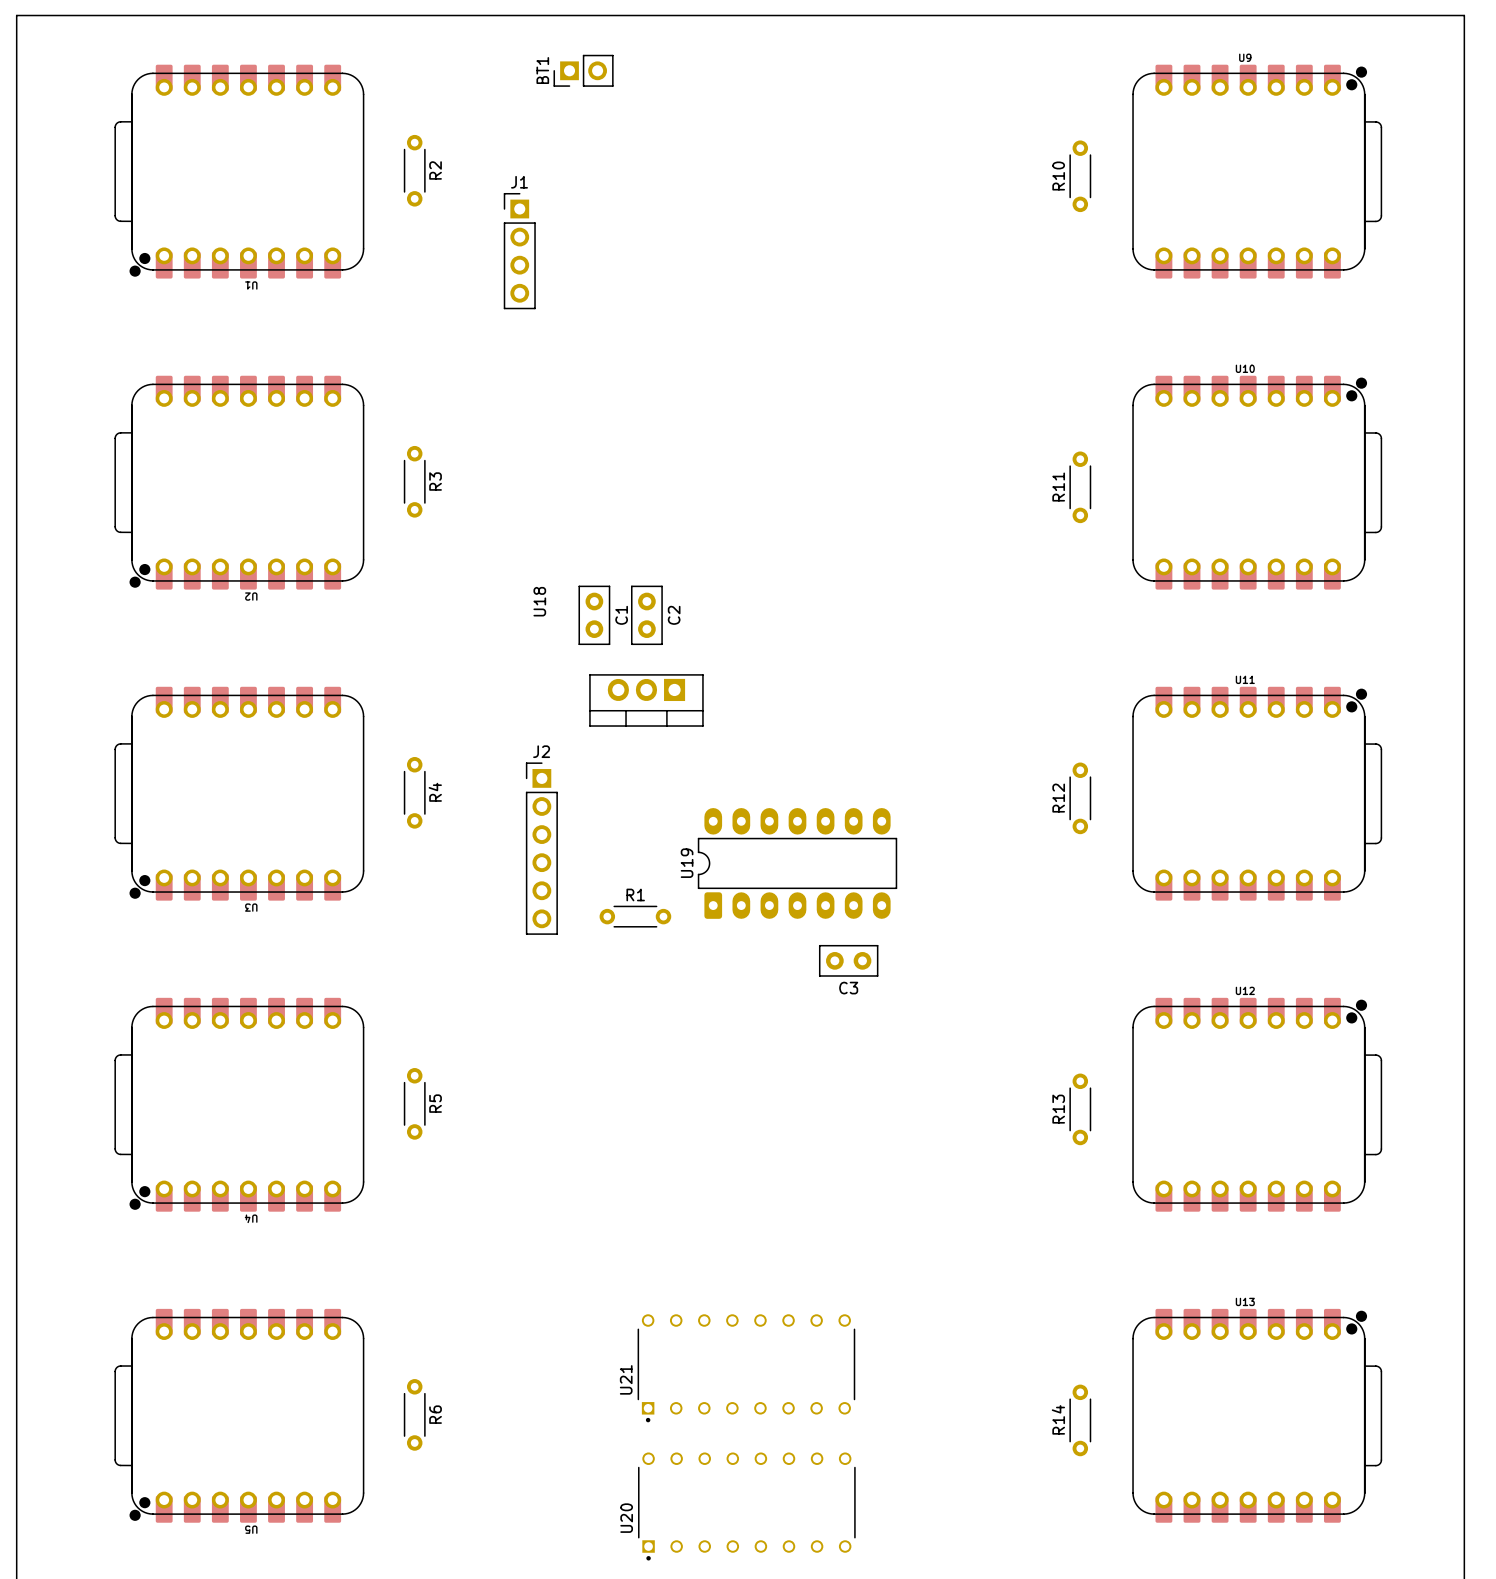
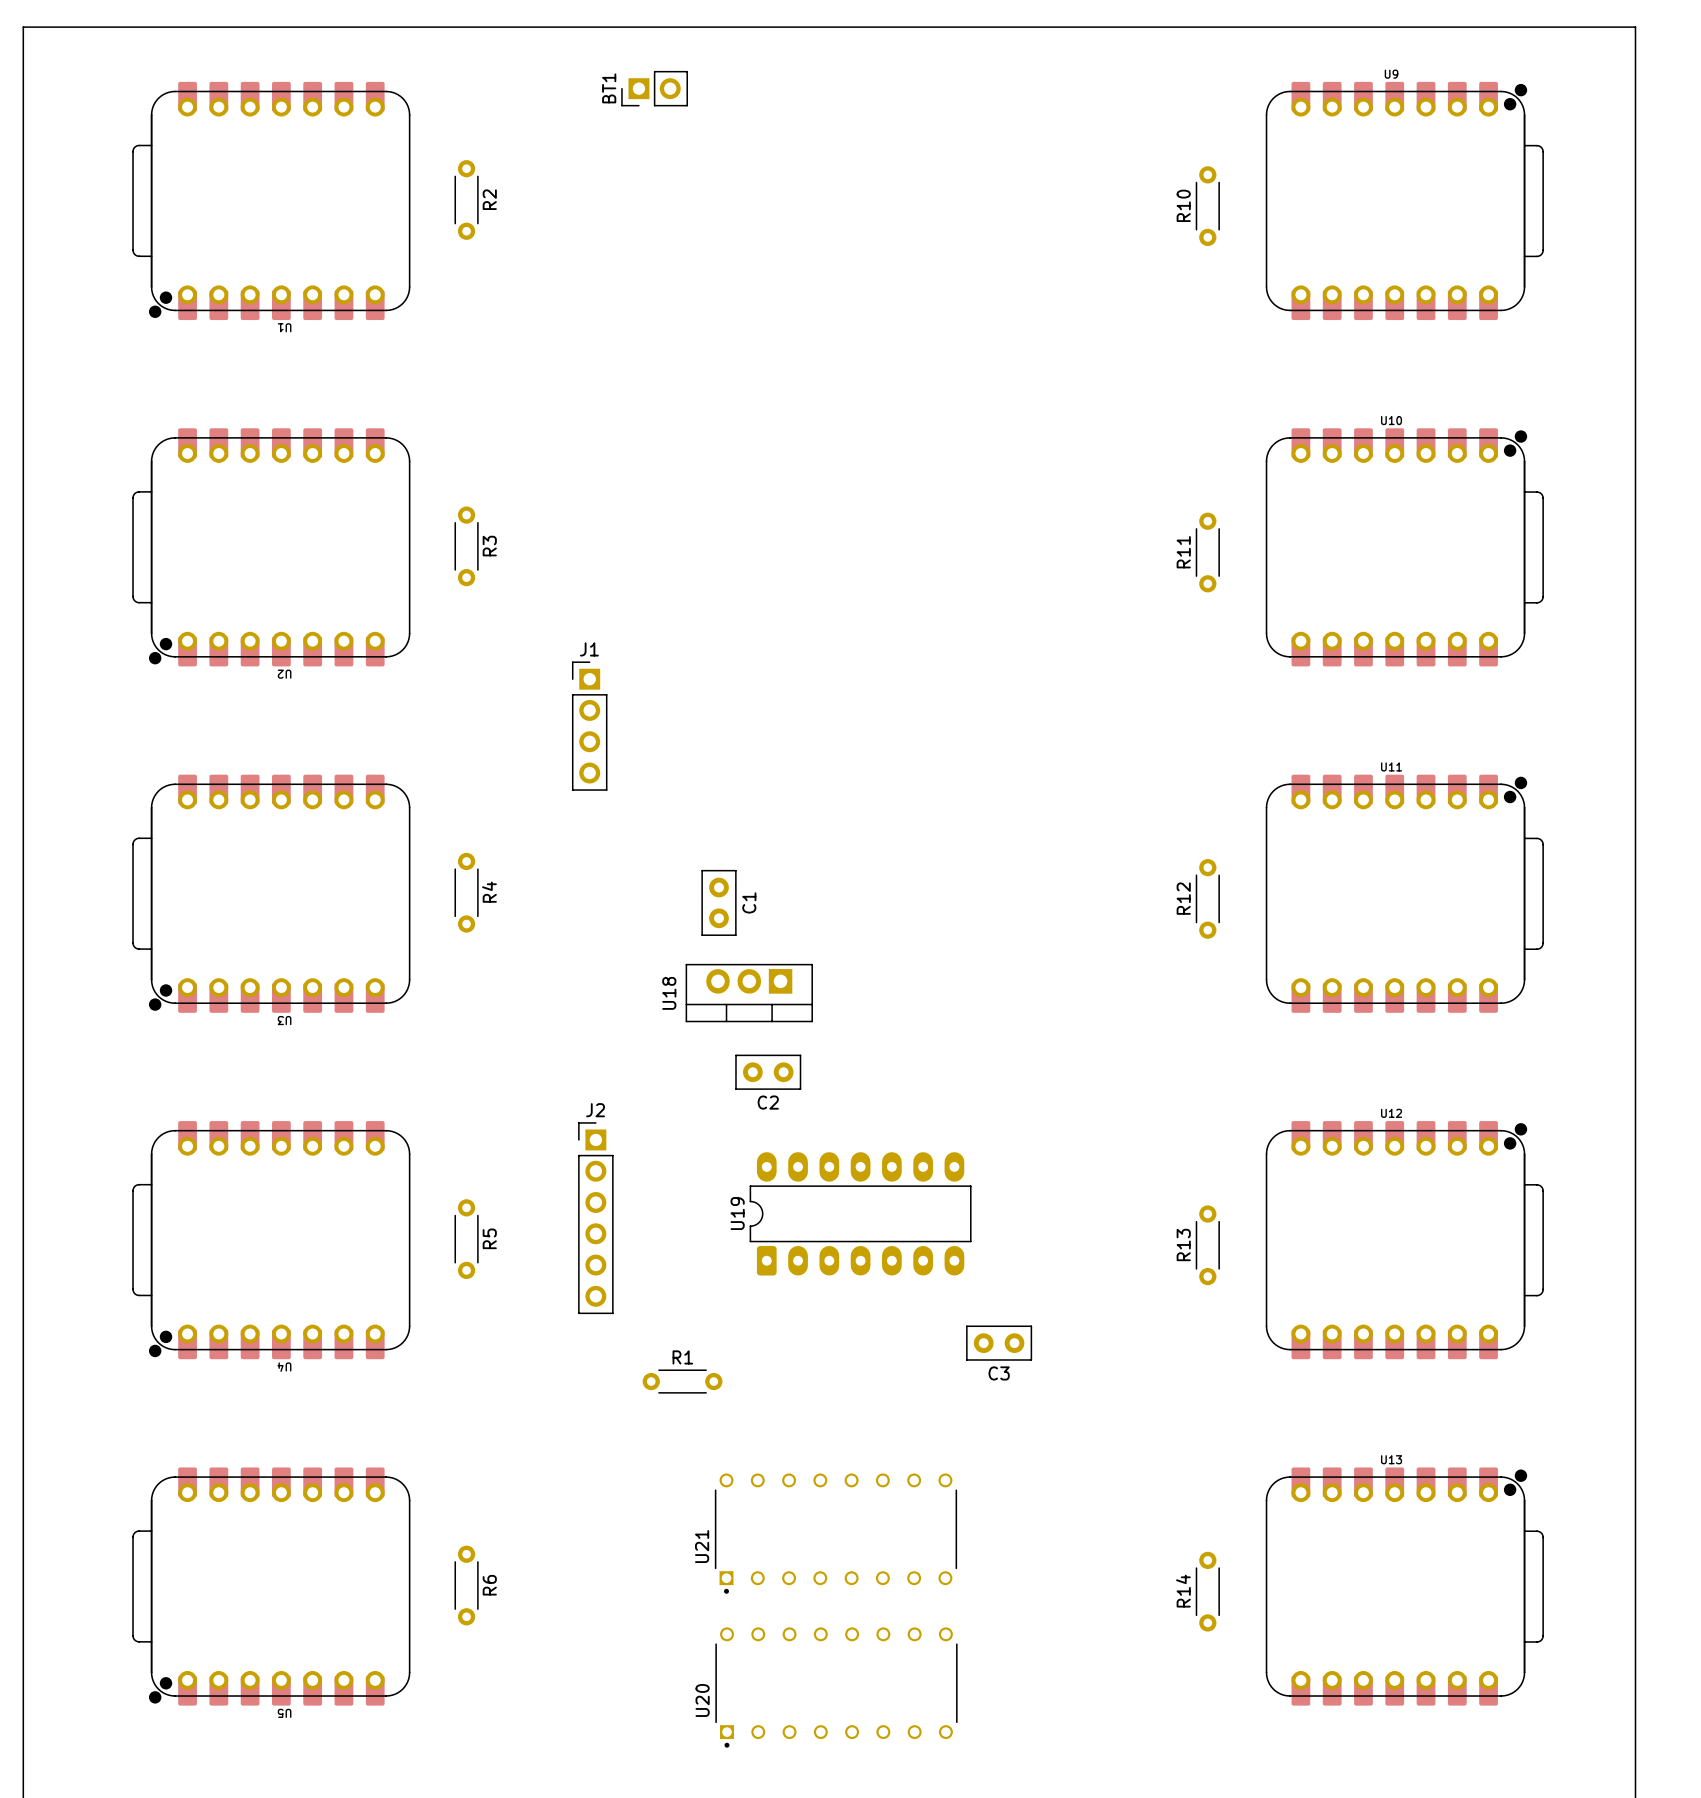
J1 position: (519, 251) -> (589, 726)
U18 name position: U18 (539, 601) -> U18 (669, 993)
C1 position: (594, 615) -> (719, 902)
C2 rotation: 0° (646, 615) -> 90° clockwise (768, 1072)
C2 position: (646, 615) -> (768, 1072)
U18 position: (646, 700) -> (749, 993)
J2 position: (541, 848) -> (595, 1218)
U19 position: (797, 863) -> (860, 1213)
R1 position: (635, 916) -> (682, 1381)
C3 position: (848, 960) -> (999, 1343)

